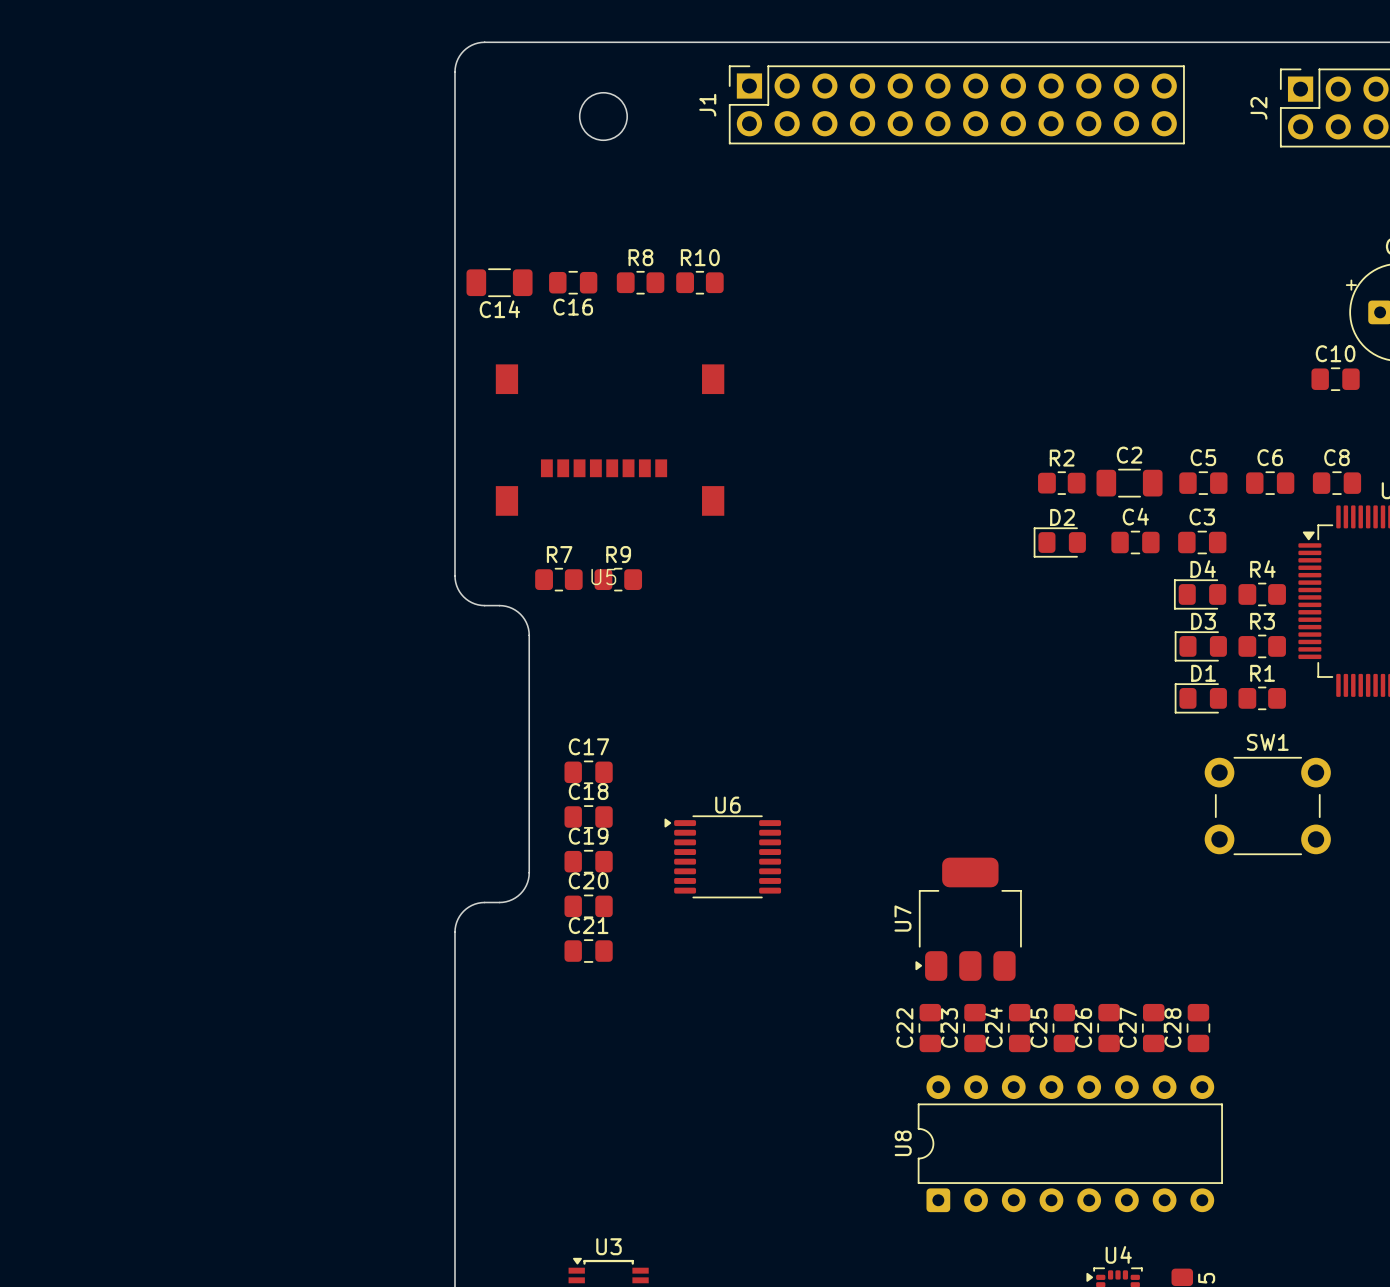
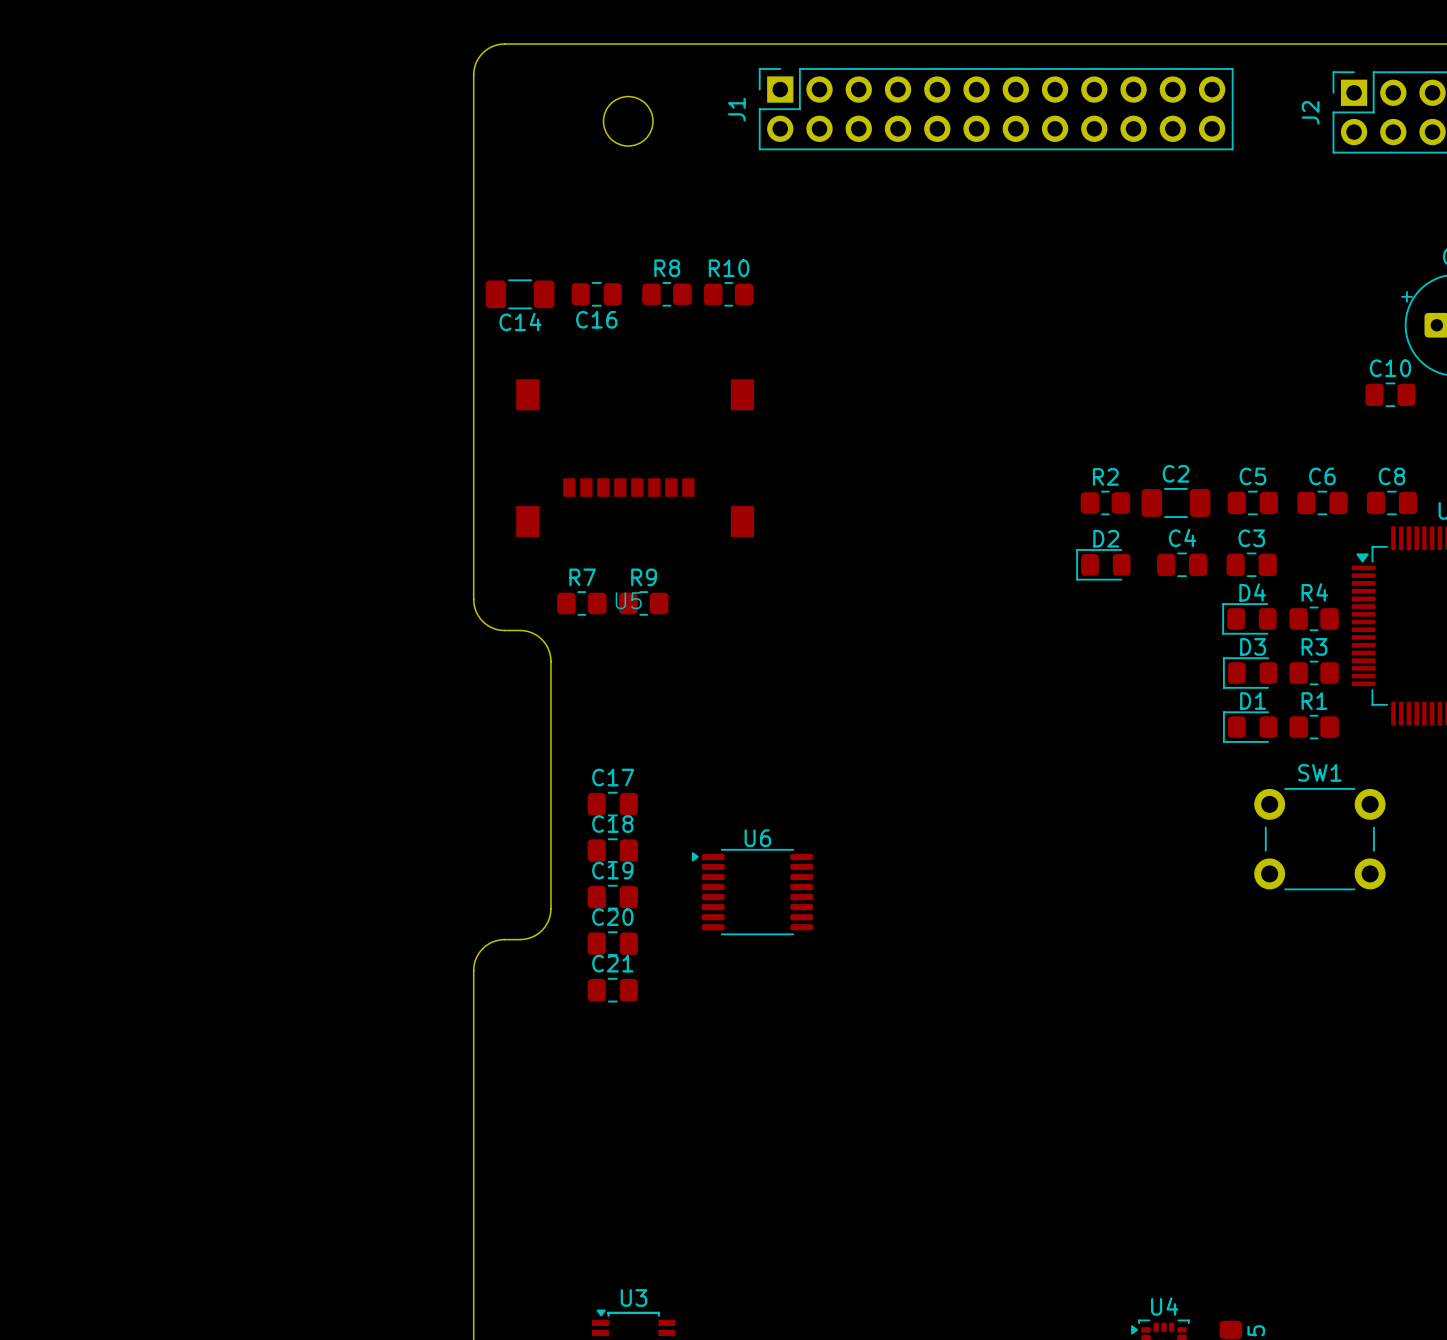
U7: (968, 919) -> none
C22: (930, 1028) -> none
C23: (975, 1028) -> none
C24: (1019, 1028) -> none
C25: (1064, 1028) -> none
C26: (1109, 1028) -> none
C27: (1153, 1028) -> none
C28: (1198, 1028) -> none
U8: (1070, 1143) -> none

